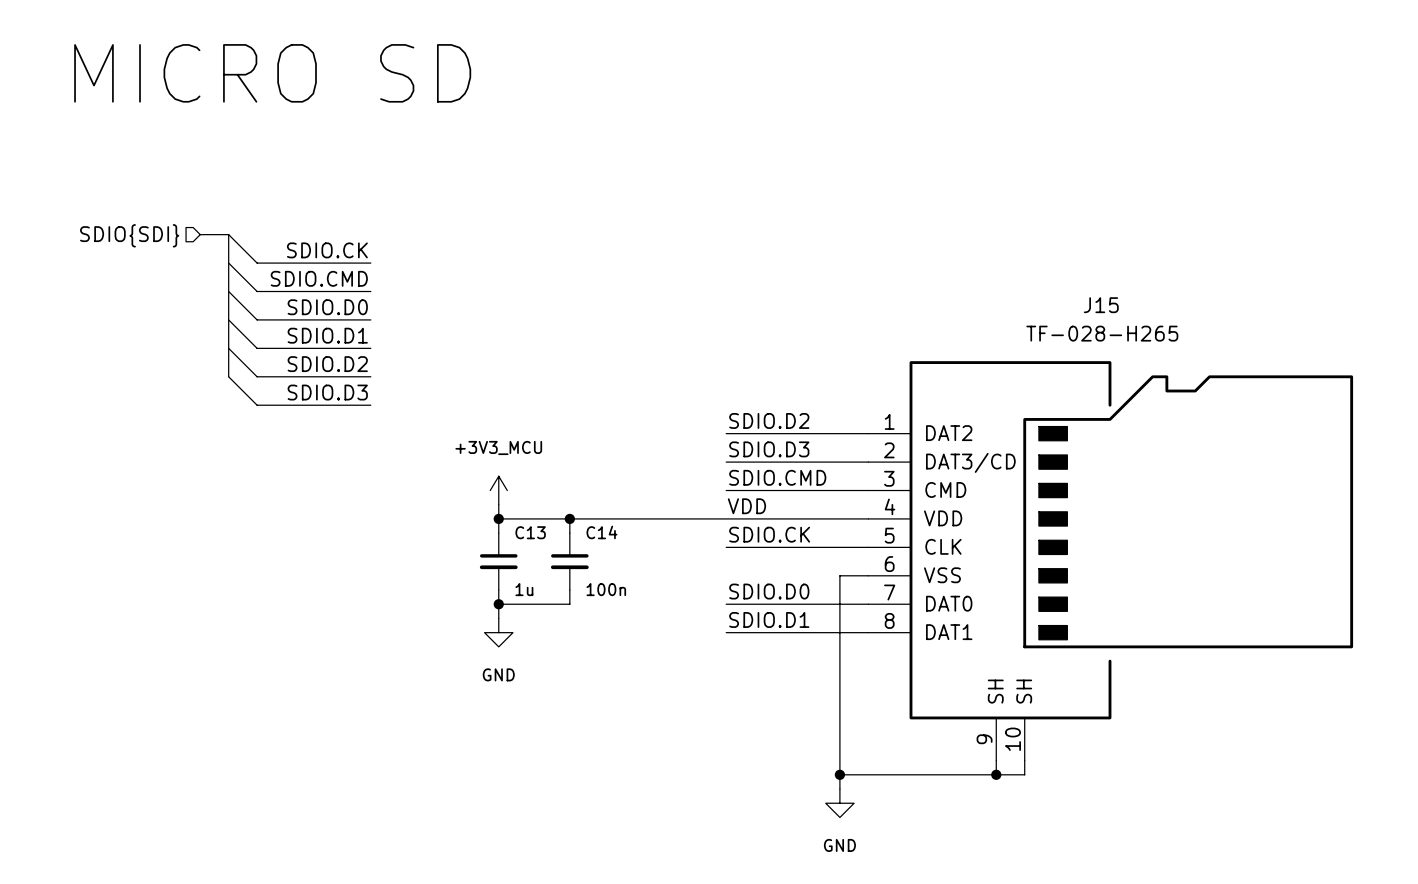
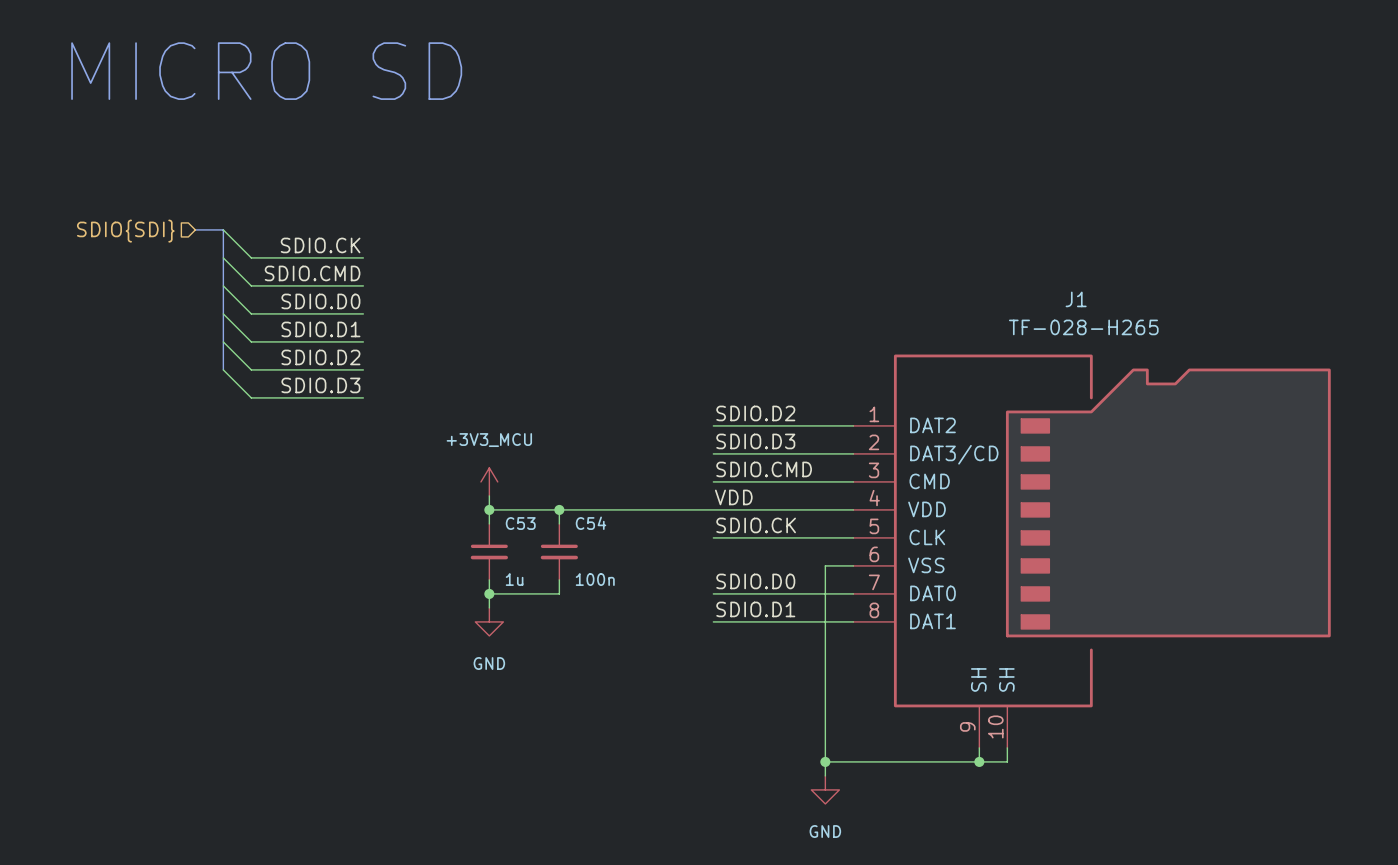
J15 name: J15 (1101, 305) -> J1 (1076, 299)
C13 name: C13 (530, 532) -> C53 (520, 523)
C14 name: C14 (601, 532) -> C54 (590, 523)

